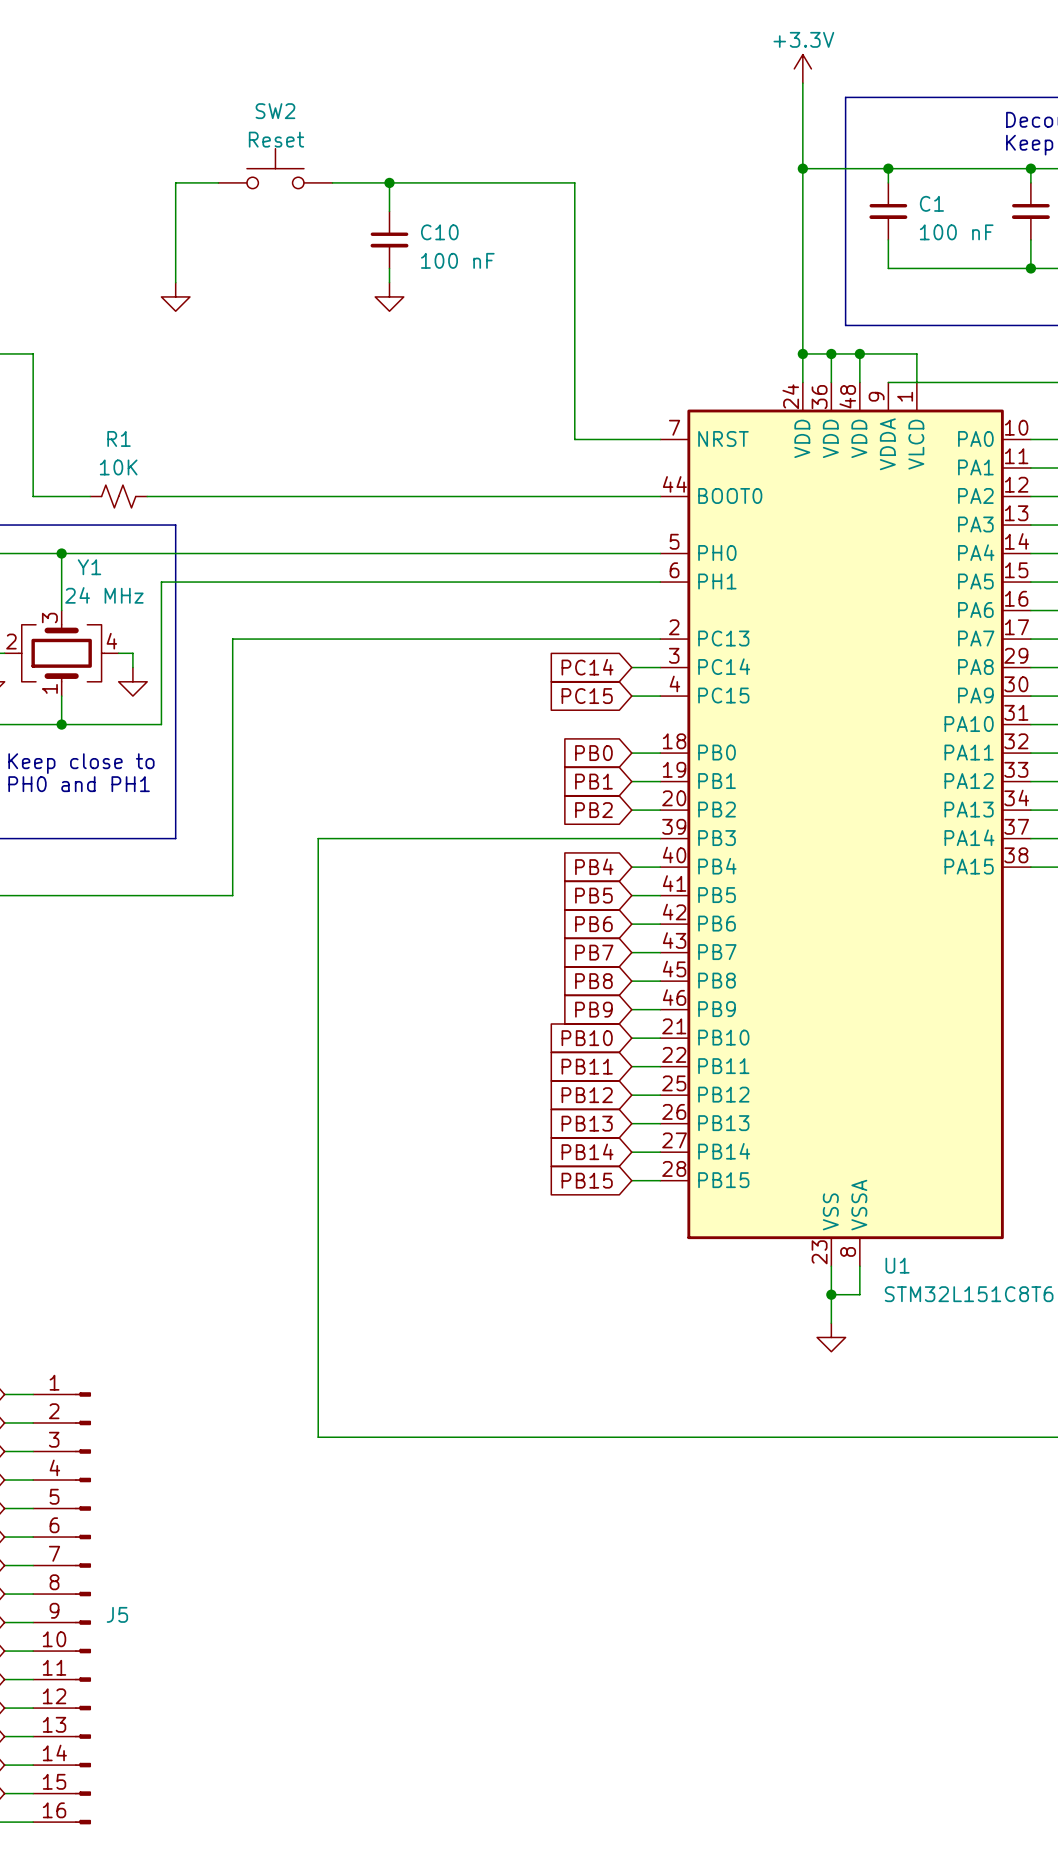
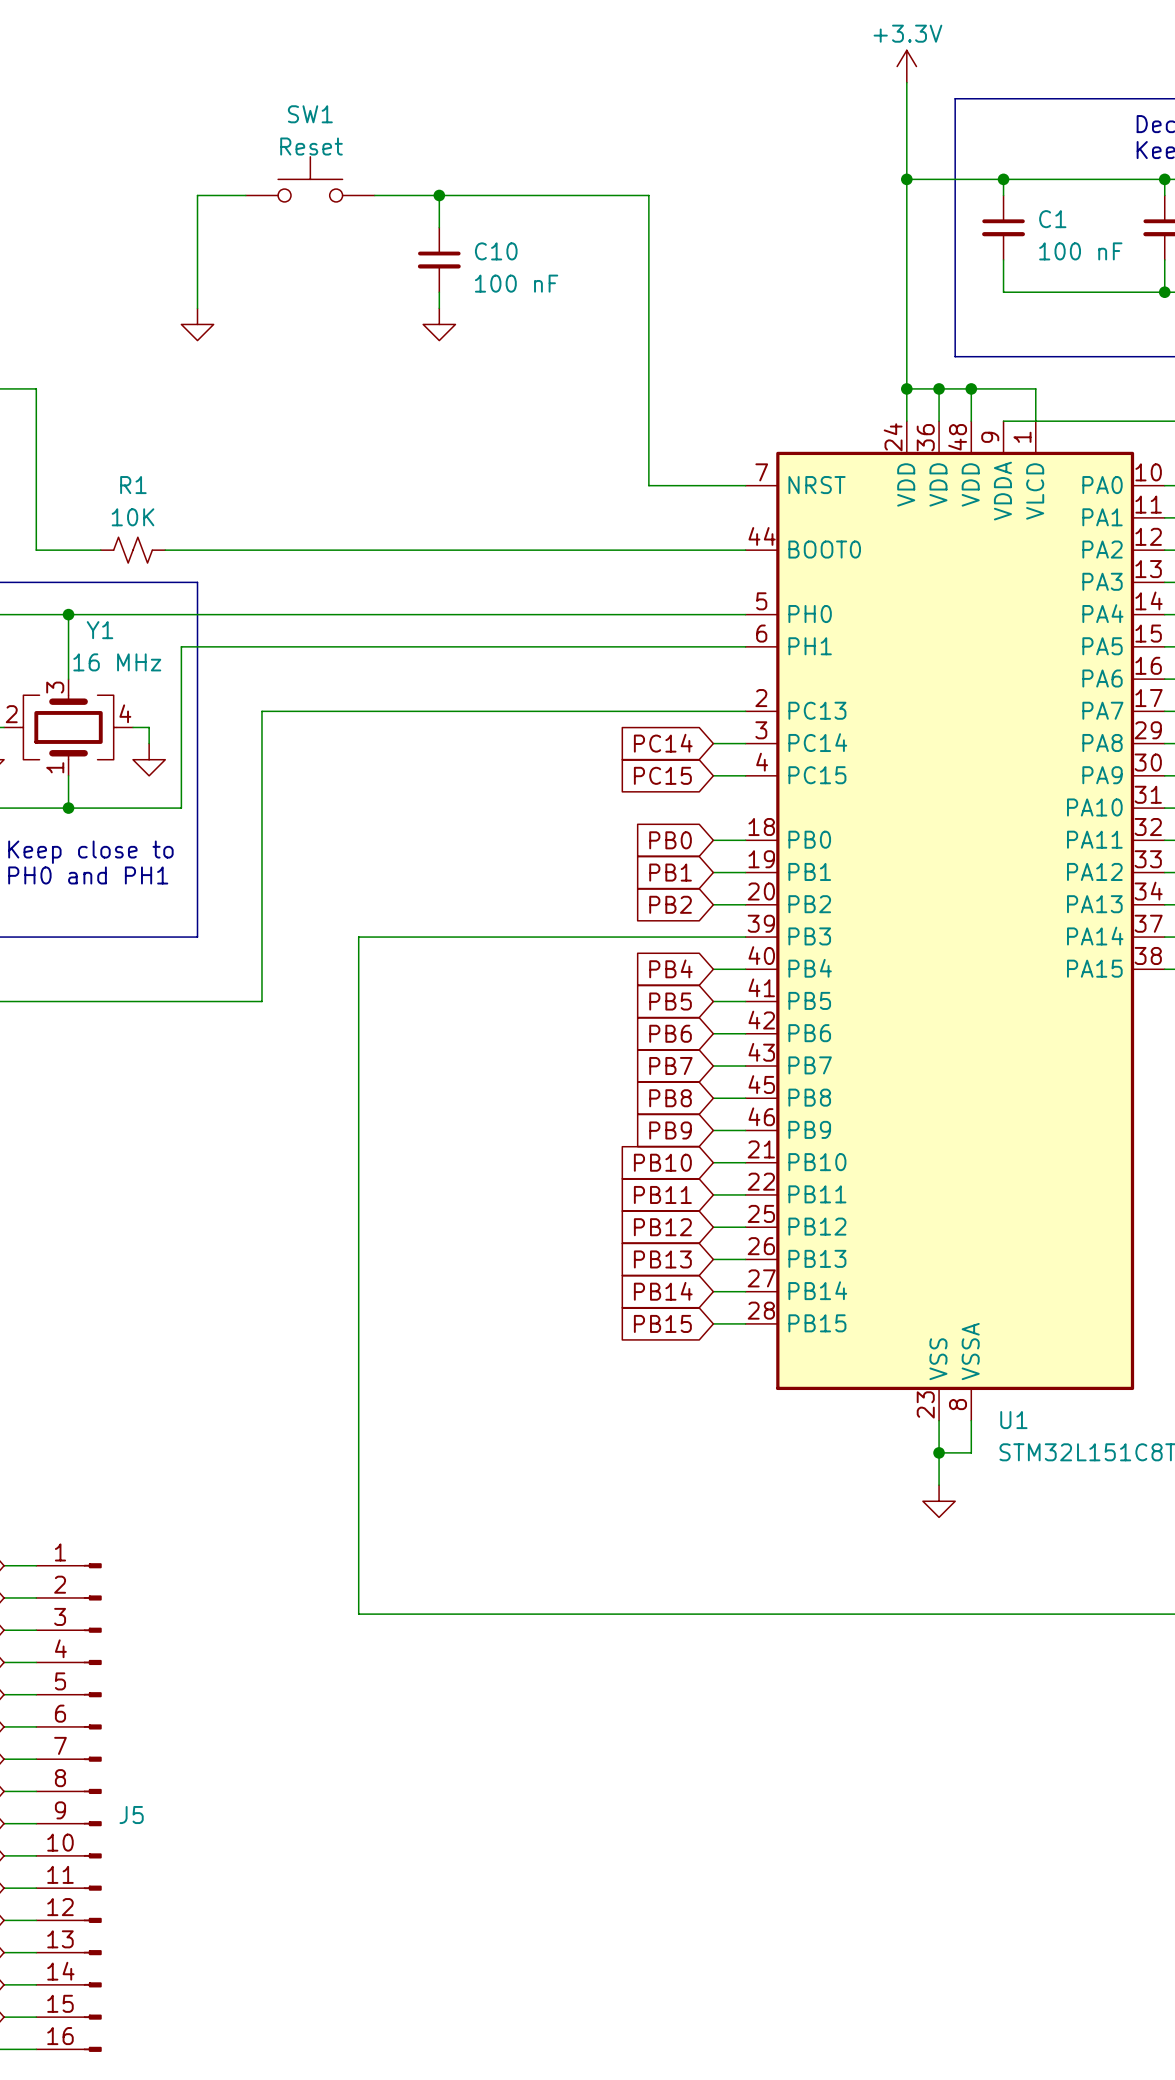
SW2 name: SW2 (275, 111) -> SW1 (310, 114)
Y1 value: 24 MHz (104, 595) -> 16 MHz (117, 662)

